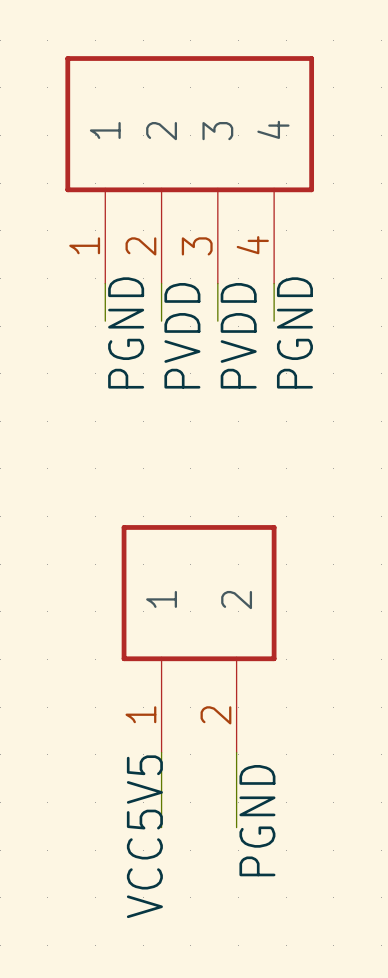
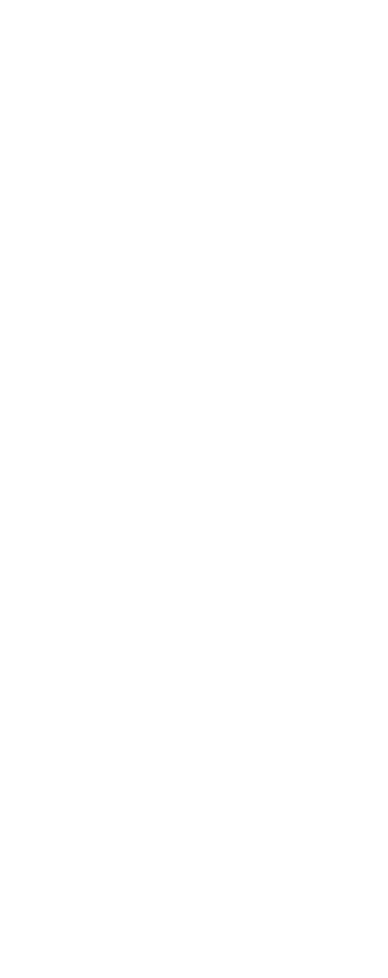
part: (189, 169) -> none
wire: (105, 283) (105, 321) -> none
wire: (161, 283) (161, 321) -> none
wire: (217, 283) (217, 321) -> none
wire: (274, 283) (274, 321) -> none
label: PGND (126, 332) -> none
label: PGND (294, 332) -> none
label: PVDD (182, 335) -> none
label: PVDD (238, 335) -> none
part: (199, 638) -> none
wire: (161, 752) (161, 827) -> none
wire: (236, 752) (236, 827) -> none
label: PGND (257, 820) -> none
label: VCC5V5 (144, 836) -> none

